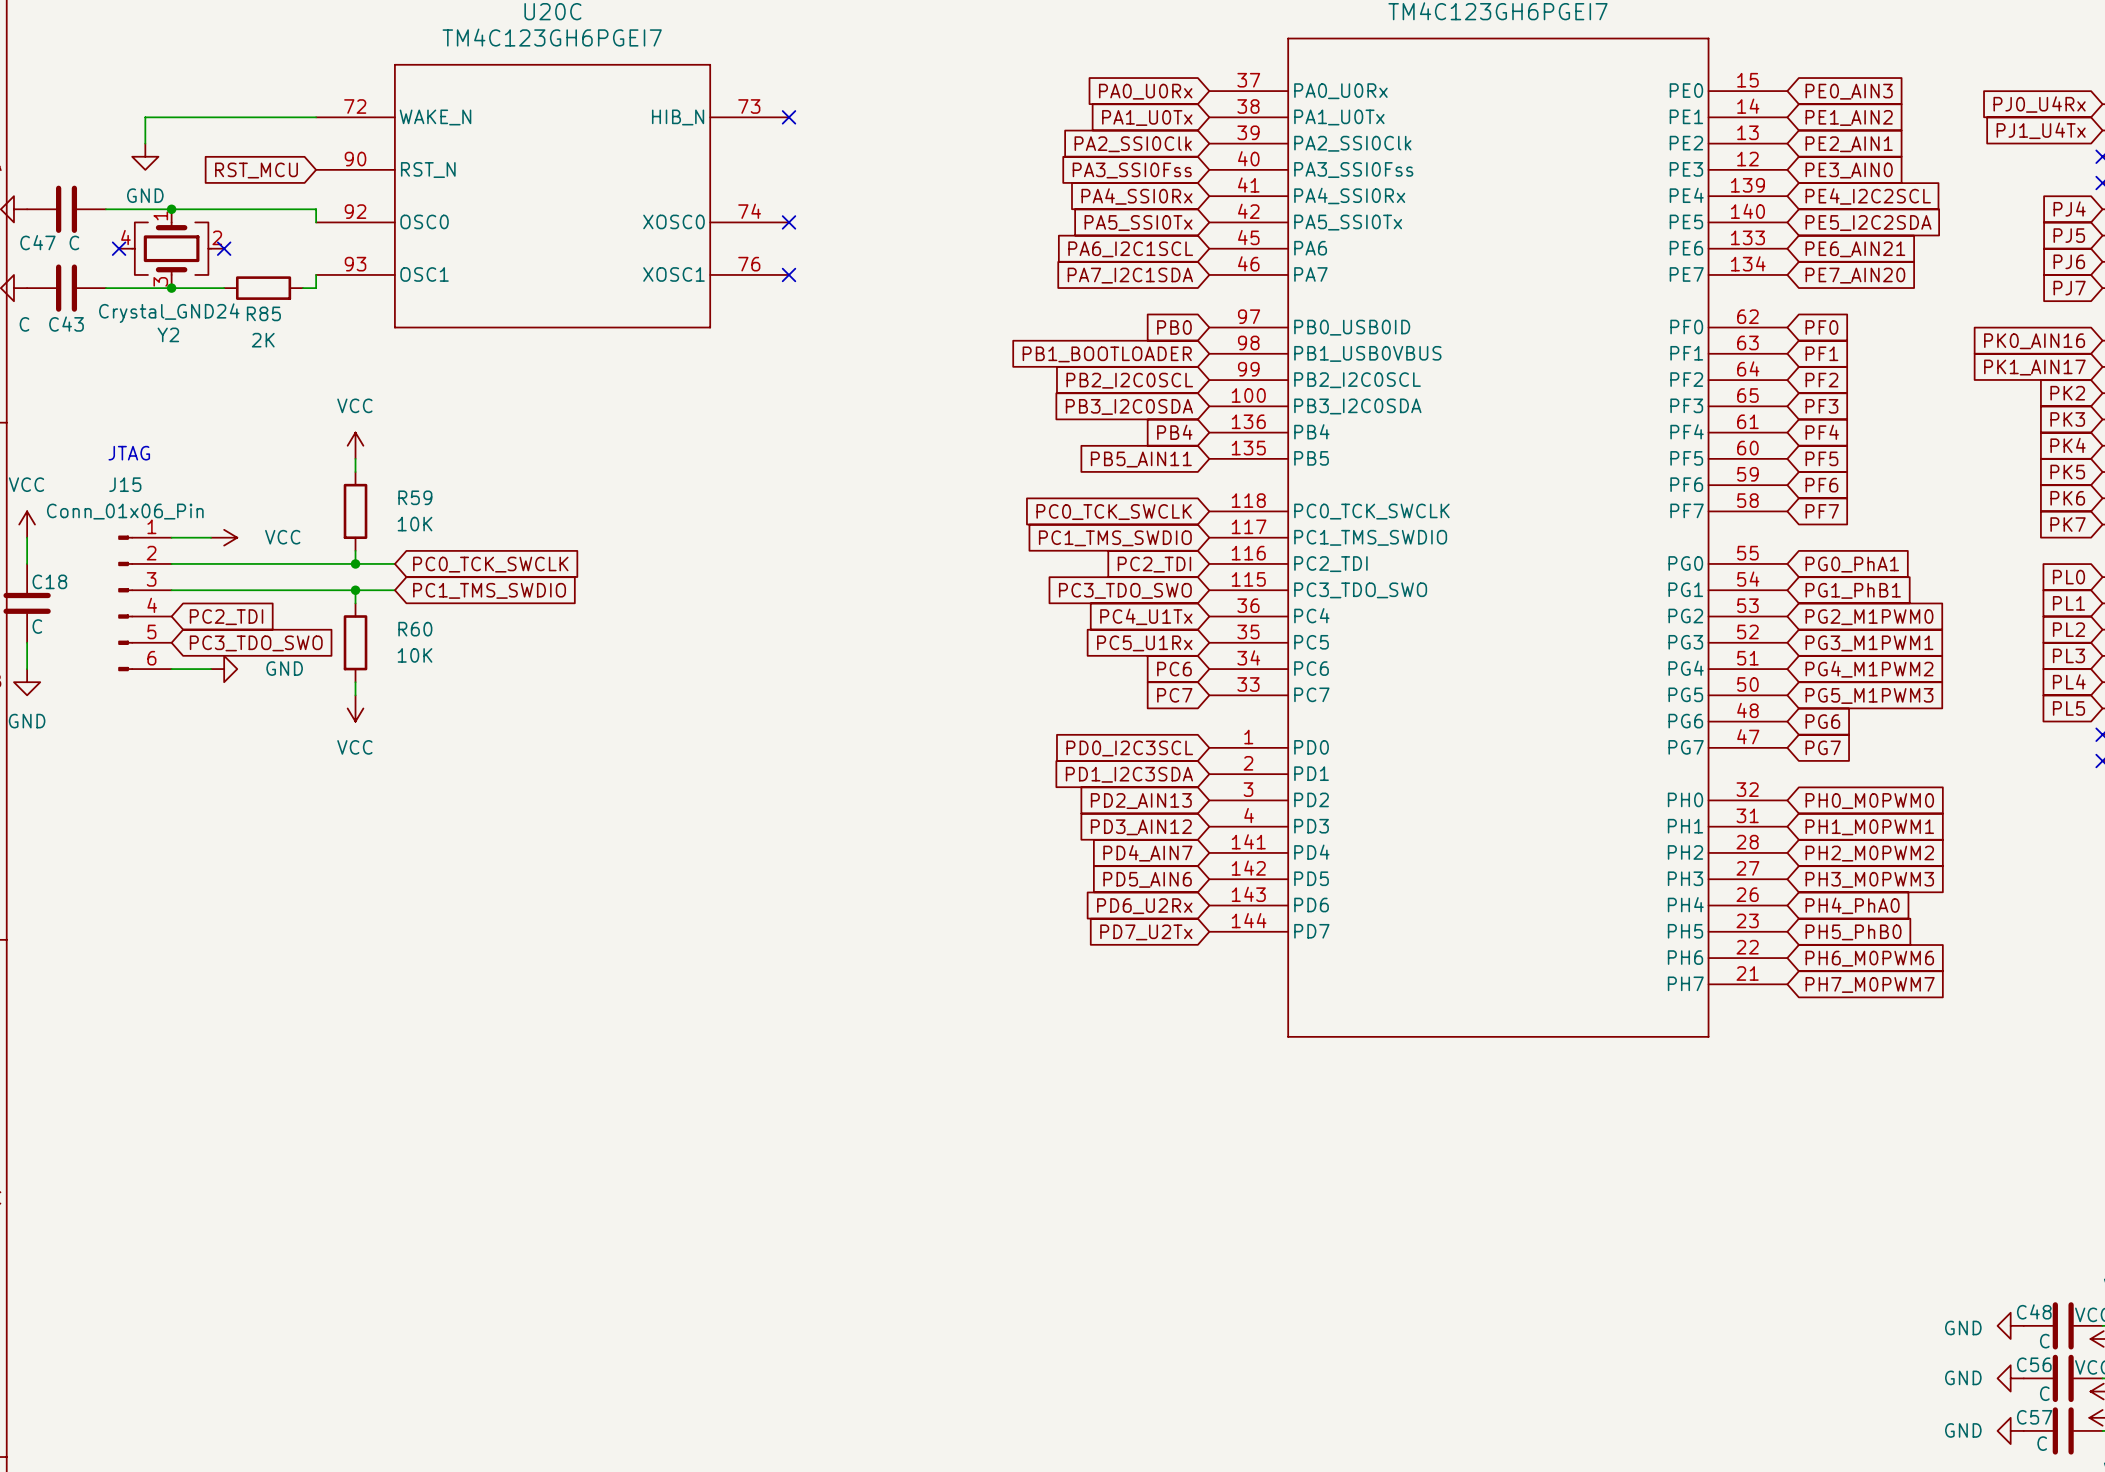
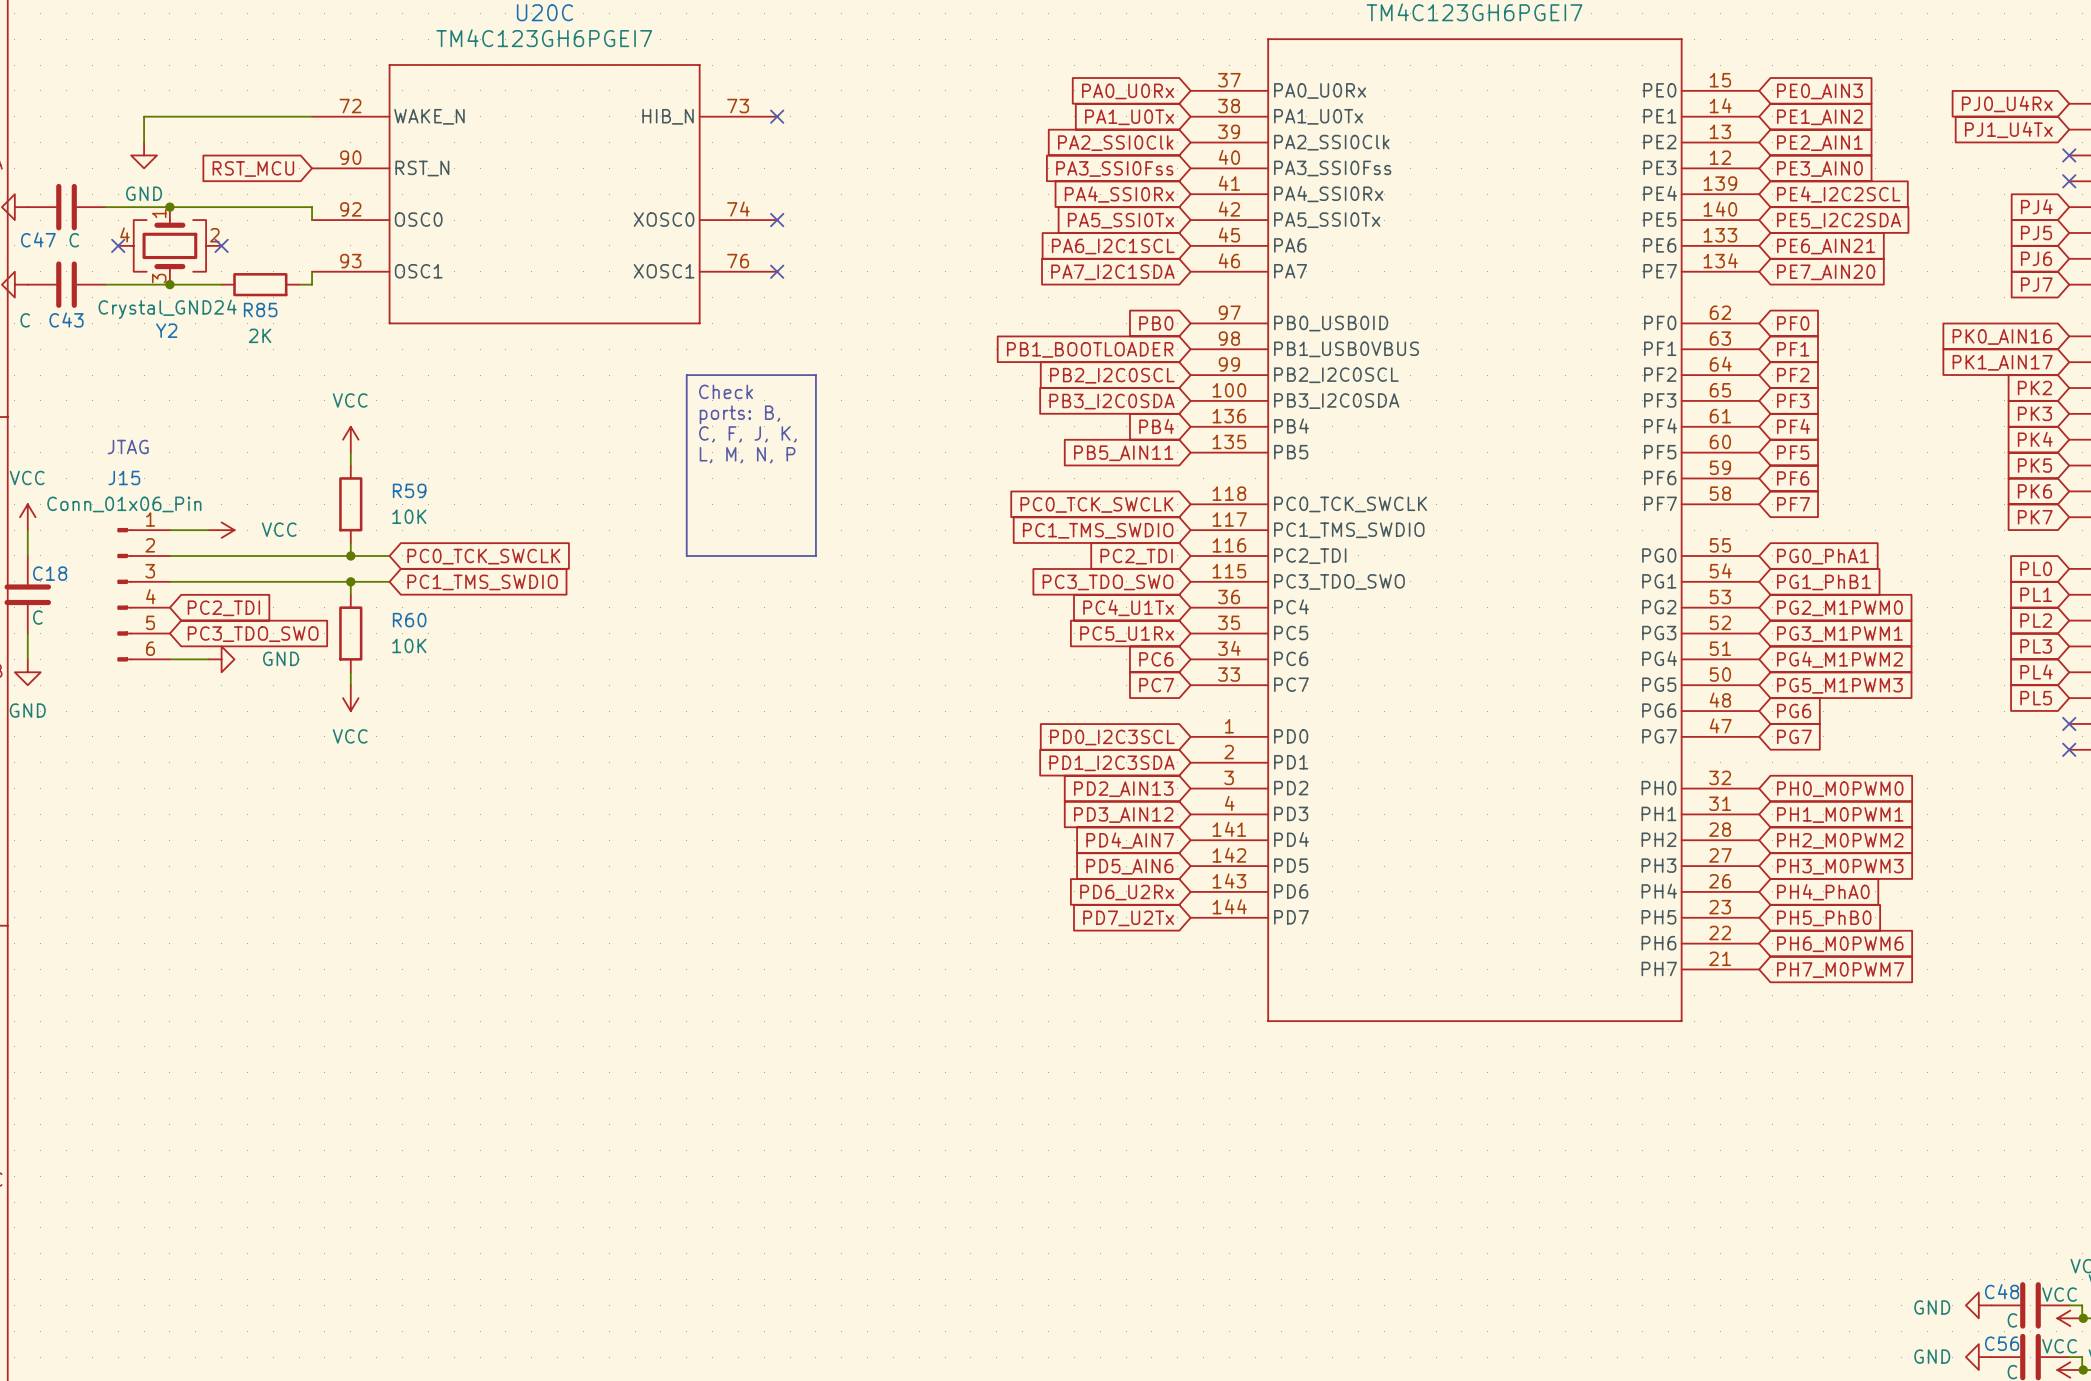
line: none -> (686, 375) (815, 375) (815, 555) (686, 555) (686, 375)
text: none -> Check (726, 391)
text: none -> ports: B, (739, 414)
text: none -> C, F, J, K, (747, 434)
text: none -> L, M, N, P (747, 455)

